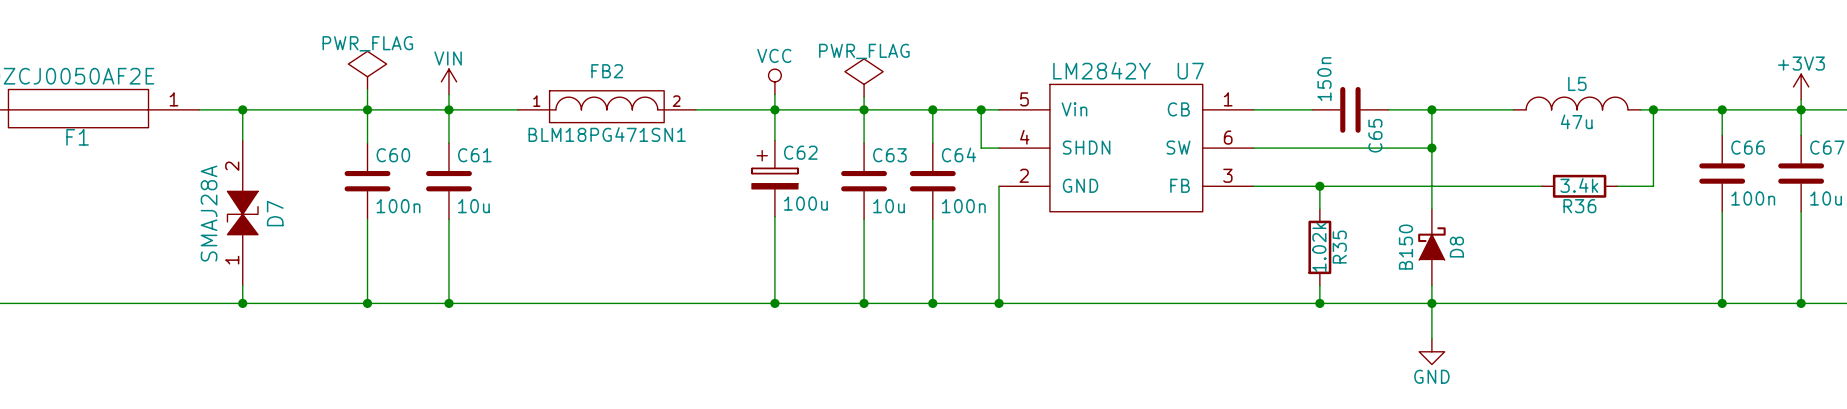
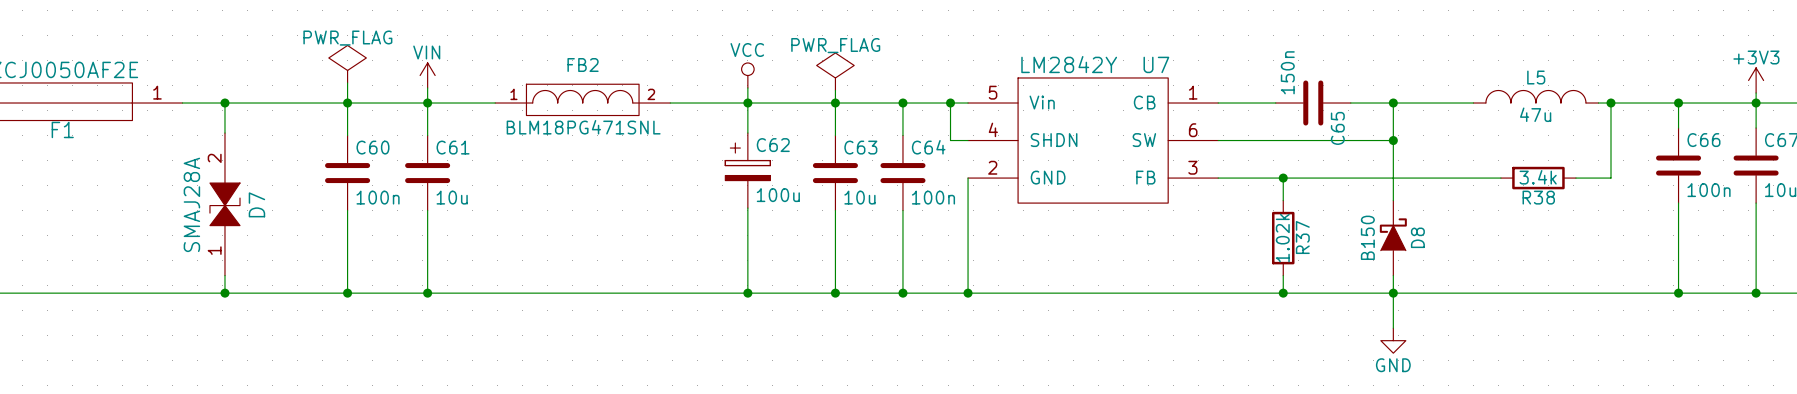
FB2 value: BLM18PG471SN1 (607, 134) -> BLM18PG471SNL (583, 127)
R36 name: R36 (1579, 206) -> R38 (1538, 197)
R35 name: R35 (1339, 247) -> R37 (1302, 237)

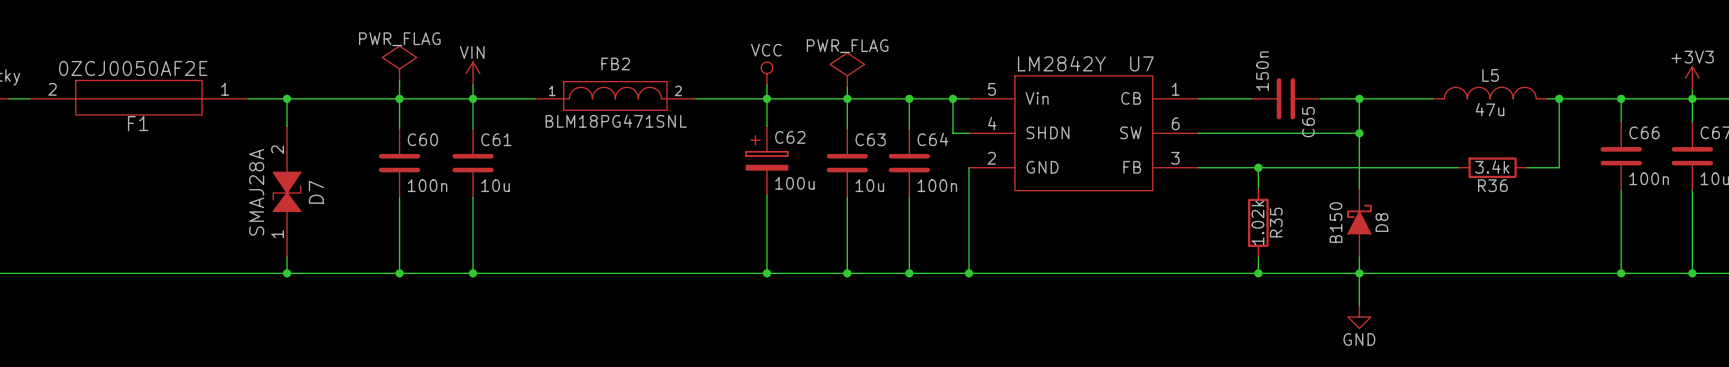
R38 name: R38 (1538, 197) -> R36 (1492, 185)
R37 name: R37 (1302, 237) -> R35 (1276, 222)

